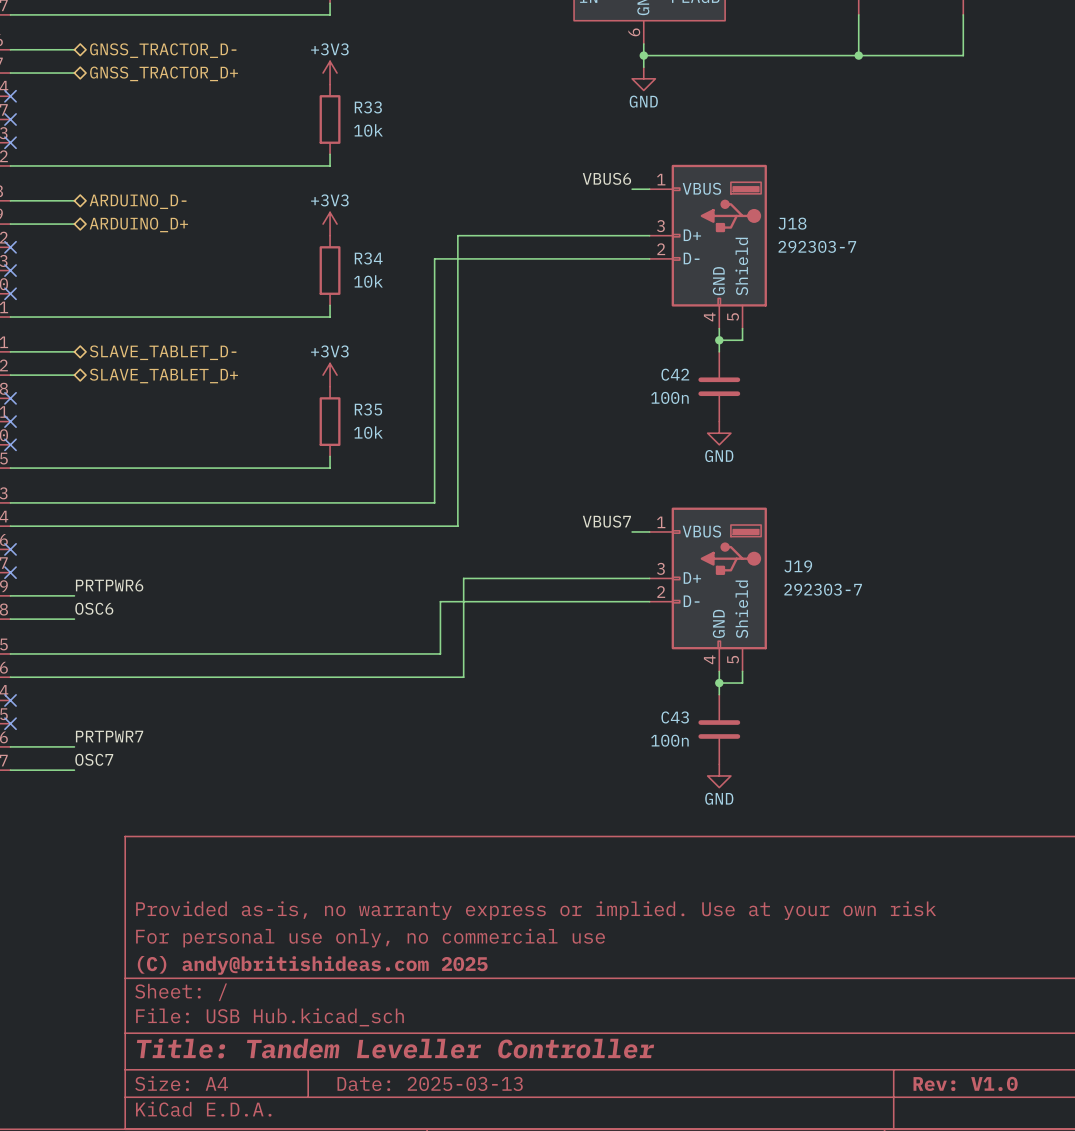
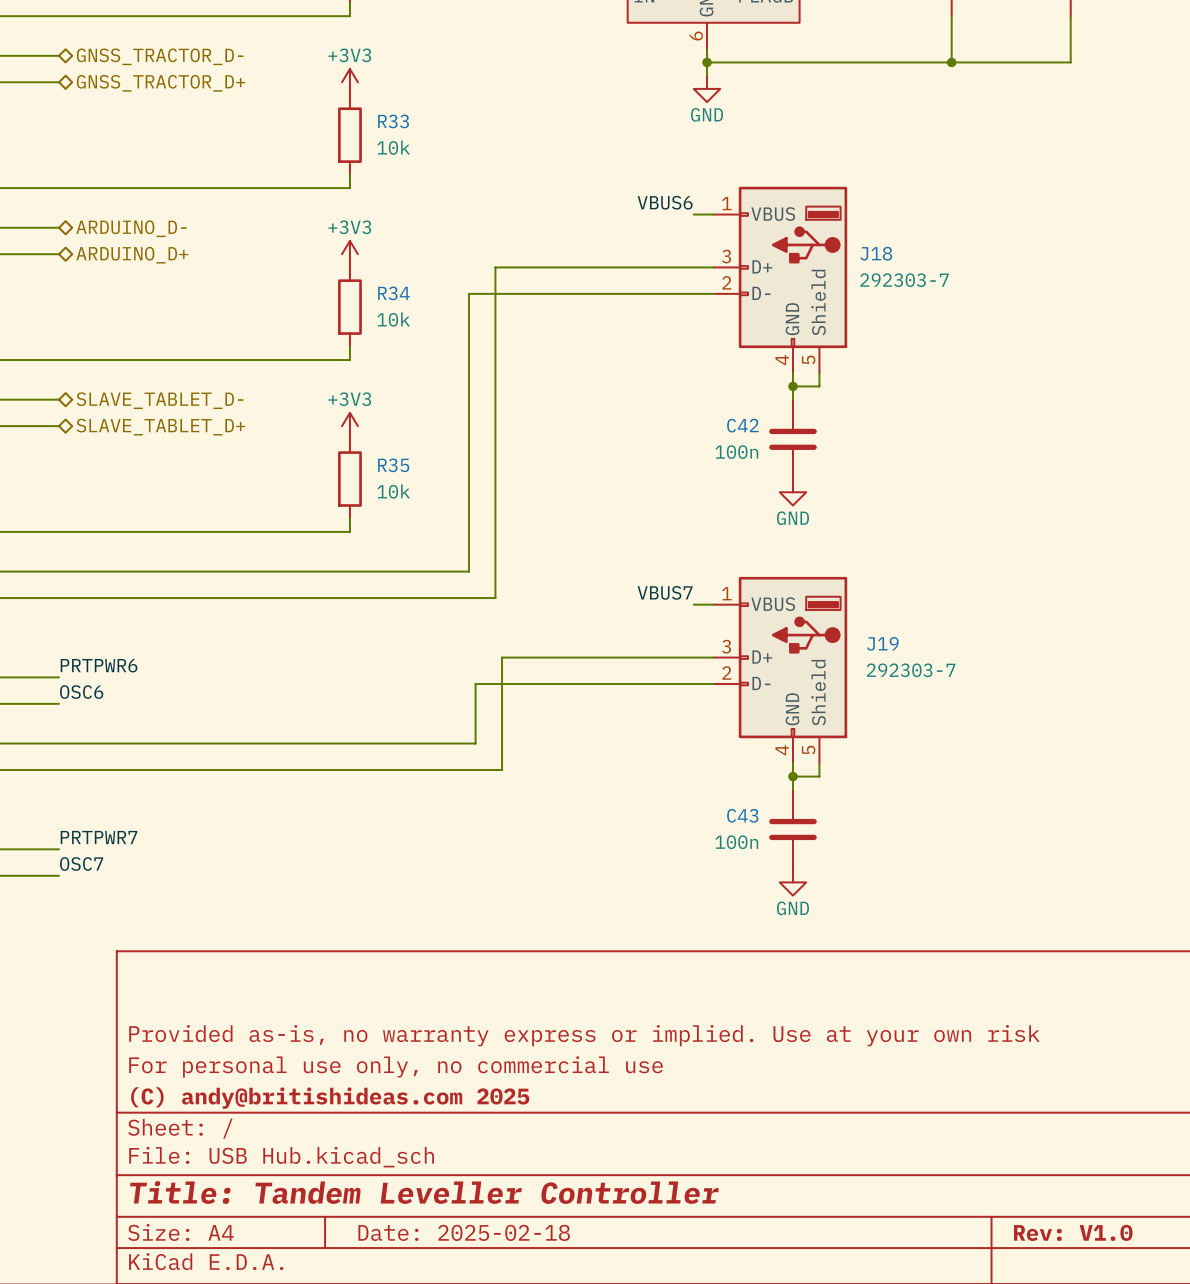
title block: Date: 2025-03-13 (430, 1083) -> Date: 2025-02-18 (464, 1232)

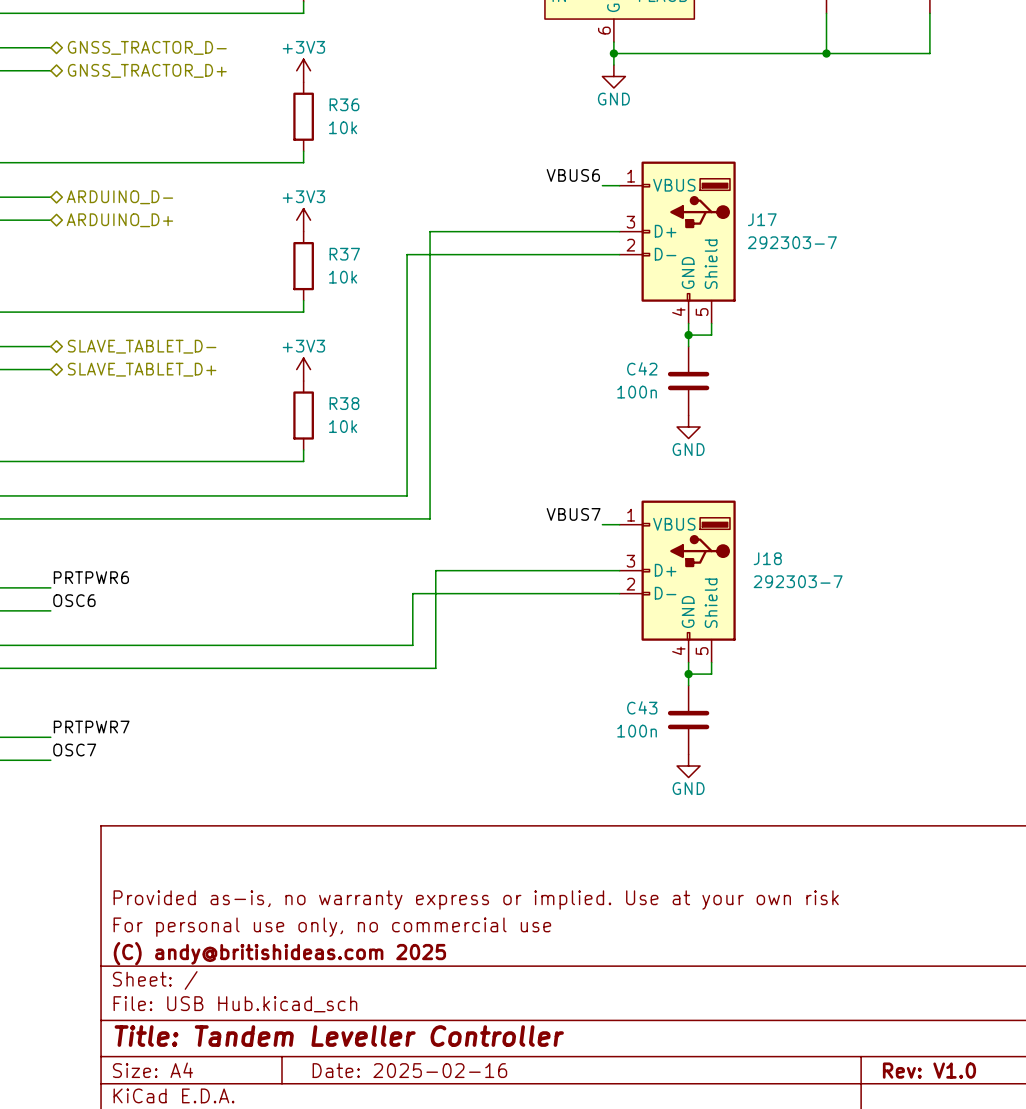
R33 name: R33 (393, 121) -> R36 (344, 104)
J18 name: J18 (876, 253) -> J17 (762, 219)
R34 name: R34 (393, 293) -> R37 (344, 254)
R35 name: R35 (393, 465) -> R38 (344, 403)
J19 name: J19 (882, 643) -> J18 (767, 558)
title block: Date: 2025-02-18 (464, 1232) -> Date: 2025-02-16 (409, 1070)

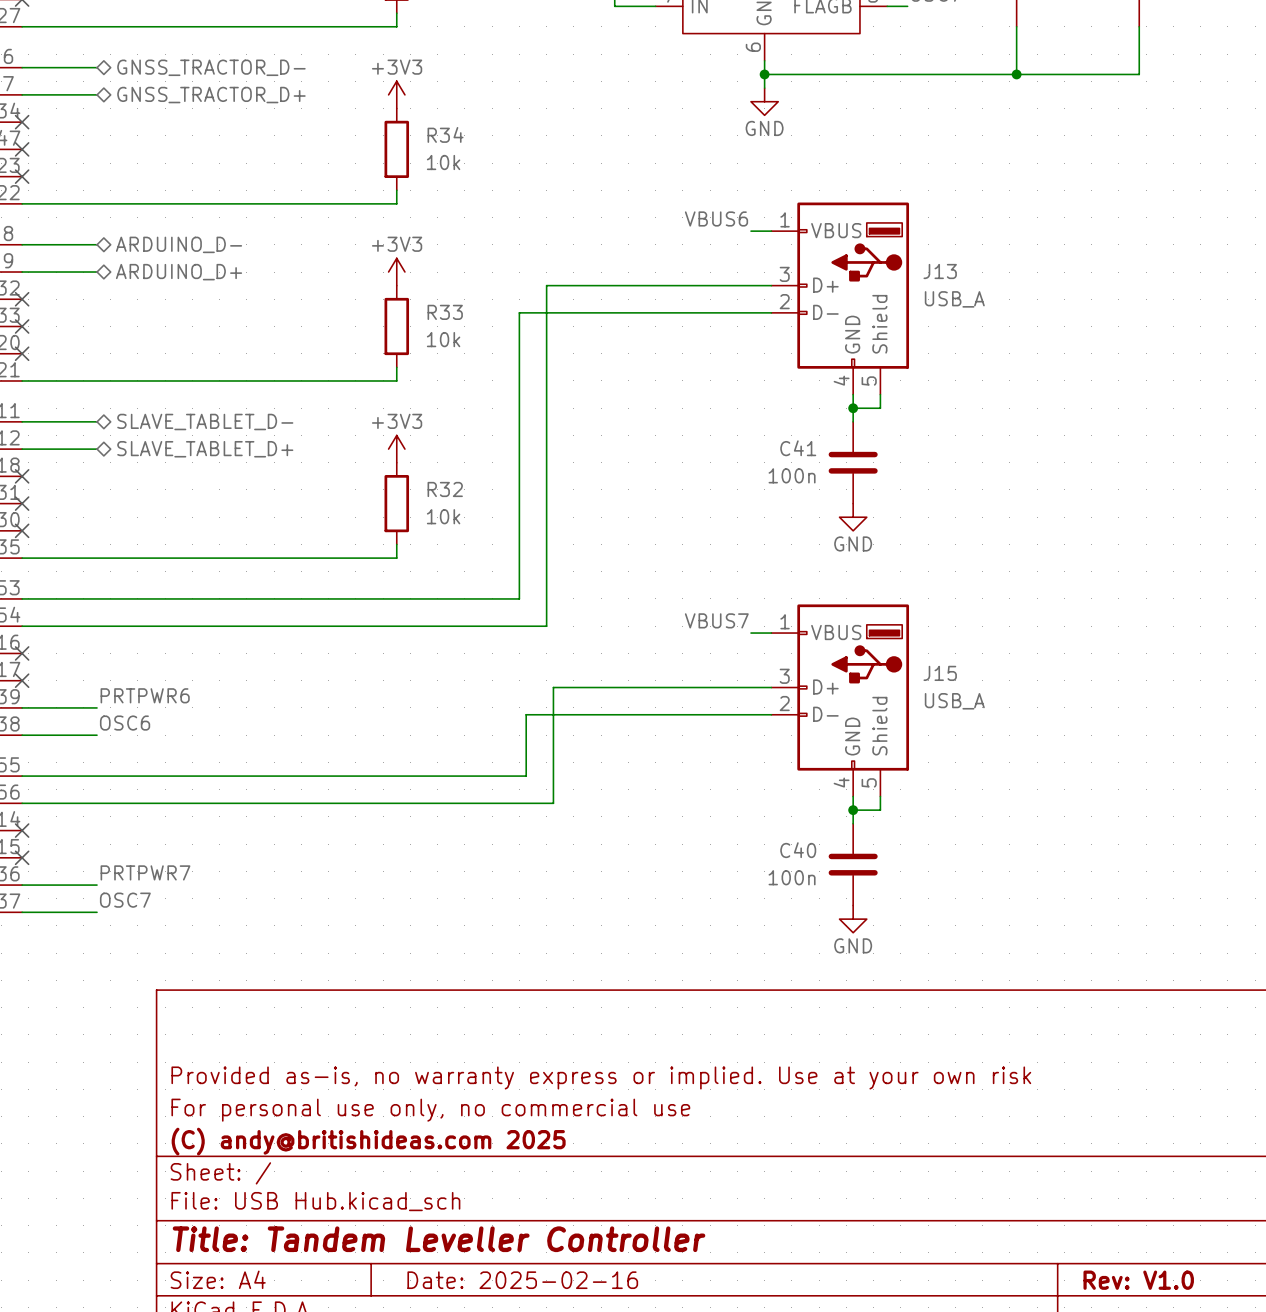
R36 name: R36 (344, 104) -> R34 (445, 134)
J17 name: J17 (762, 219) -> J13 (940, 271)
J17 value: 292303-7 (792, 242) -> USB_A (954, 299)
R37 name: R37 (344, 254) -> R33 (445, 312)
C42 name: C42 (642, 368) -> C41 (798, 448)
R38 name: R38 (344, 403) -> R32 (445, 489)
J18 name: J18 (767, 558) -> J15 (940, 673)
J18 value: 292303-7 (798, 581) -> USB_A (954, 701)
C43 name: C43 (642, 707) -> C40 (798, 850)

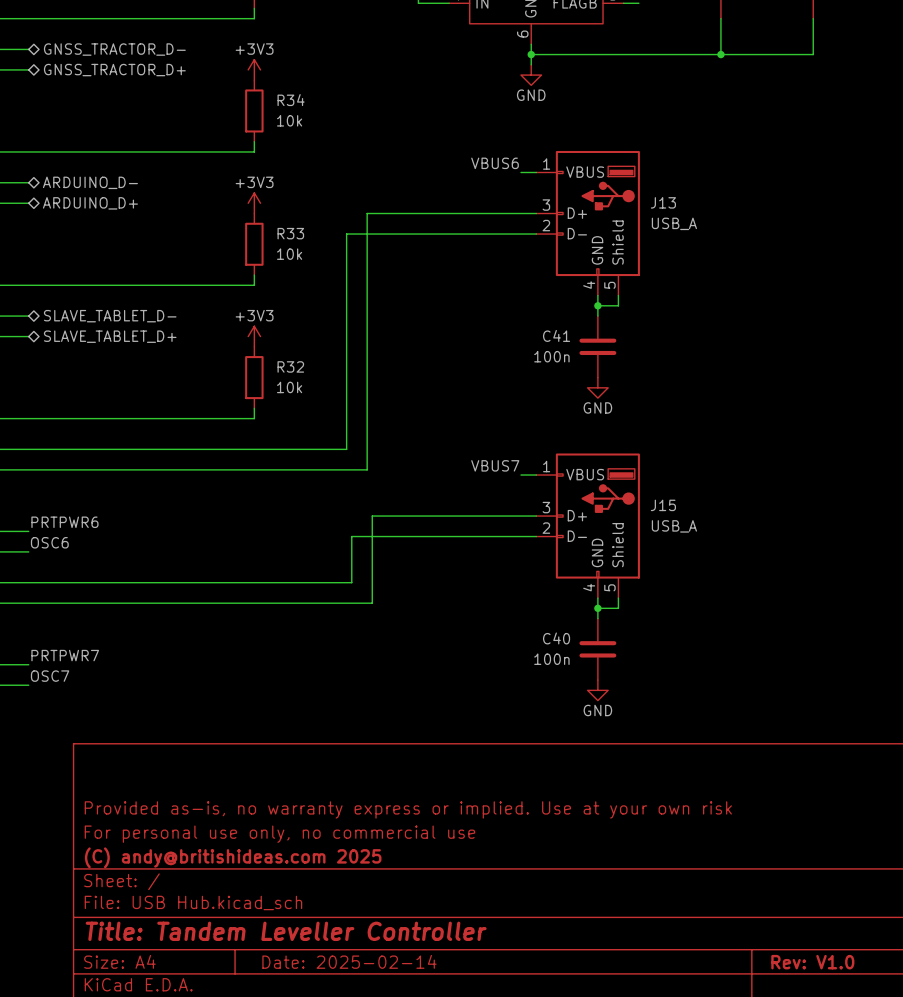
title block: Date: 2025-02-16 (522, 1280) -> Date: 2025-02-14 (349, 961)

